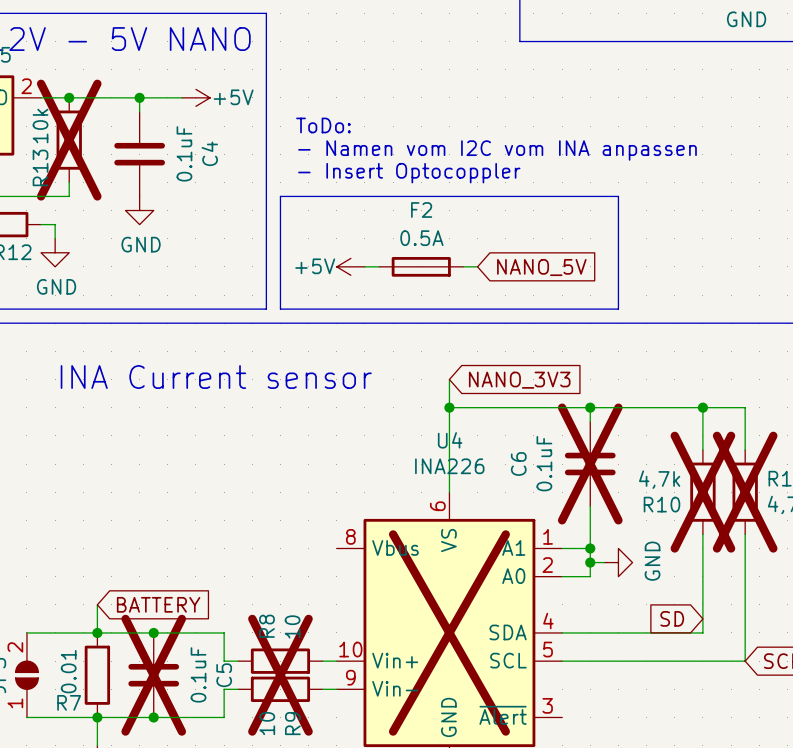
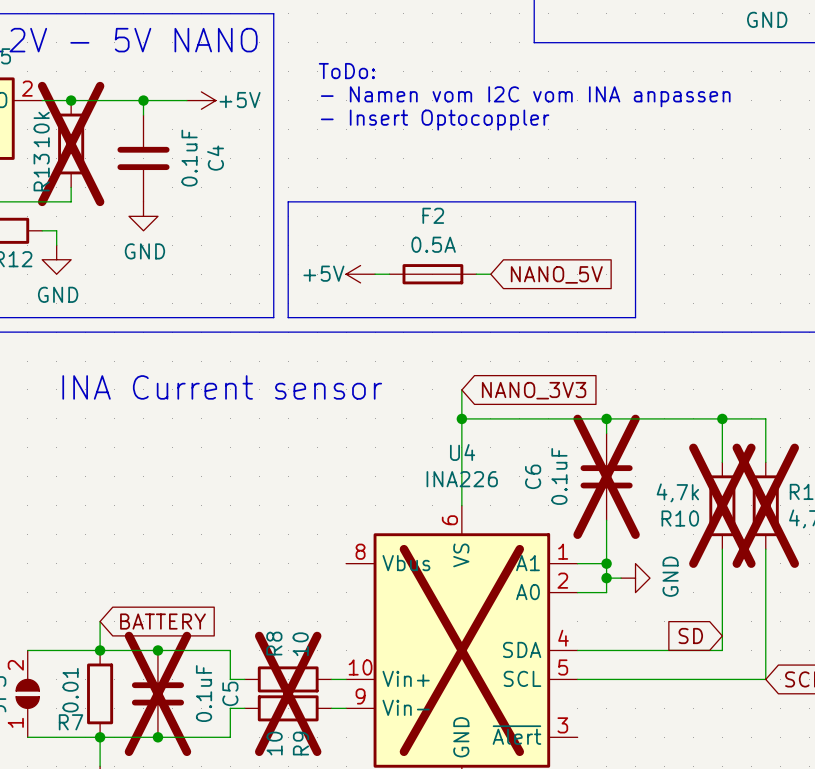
text position: ToDo: (323, 125) -> ToDo: (346, 71)
text position: - Namen vom I2C vom INA anpassen (497, 150) -> - Namen vom I2C vom INA anpassen (525, 96)
text position: - Insert Optocoppler (409, 173) -> - Insert Optocoppler (435, 120)

